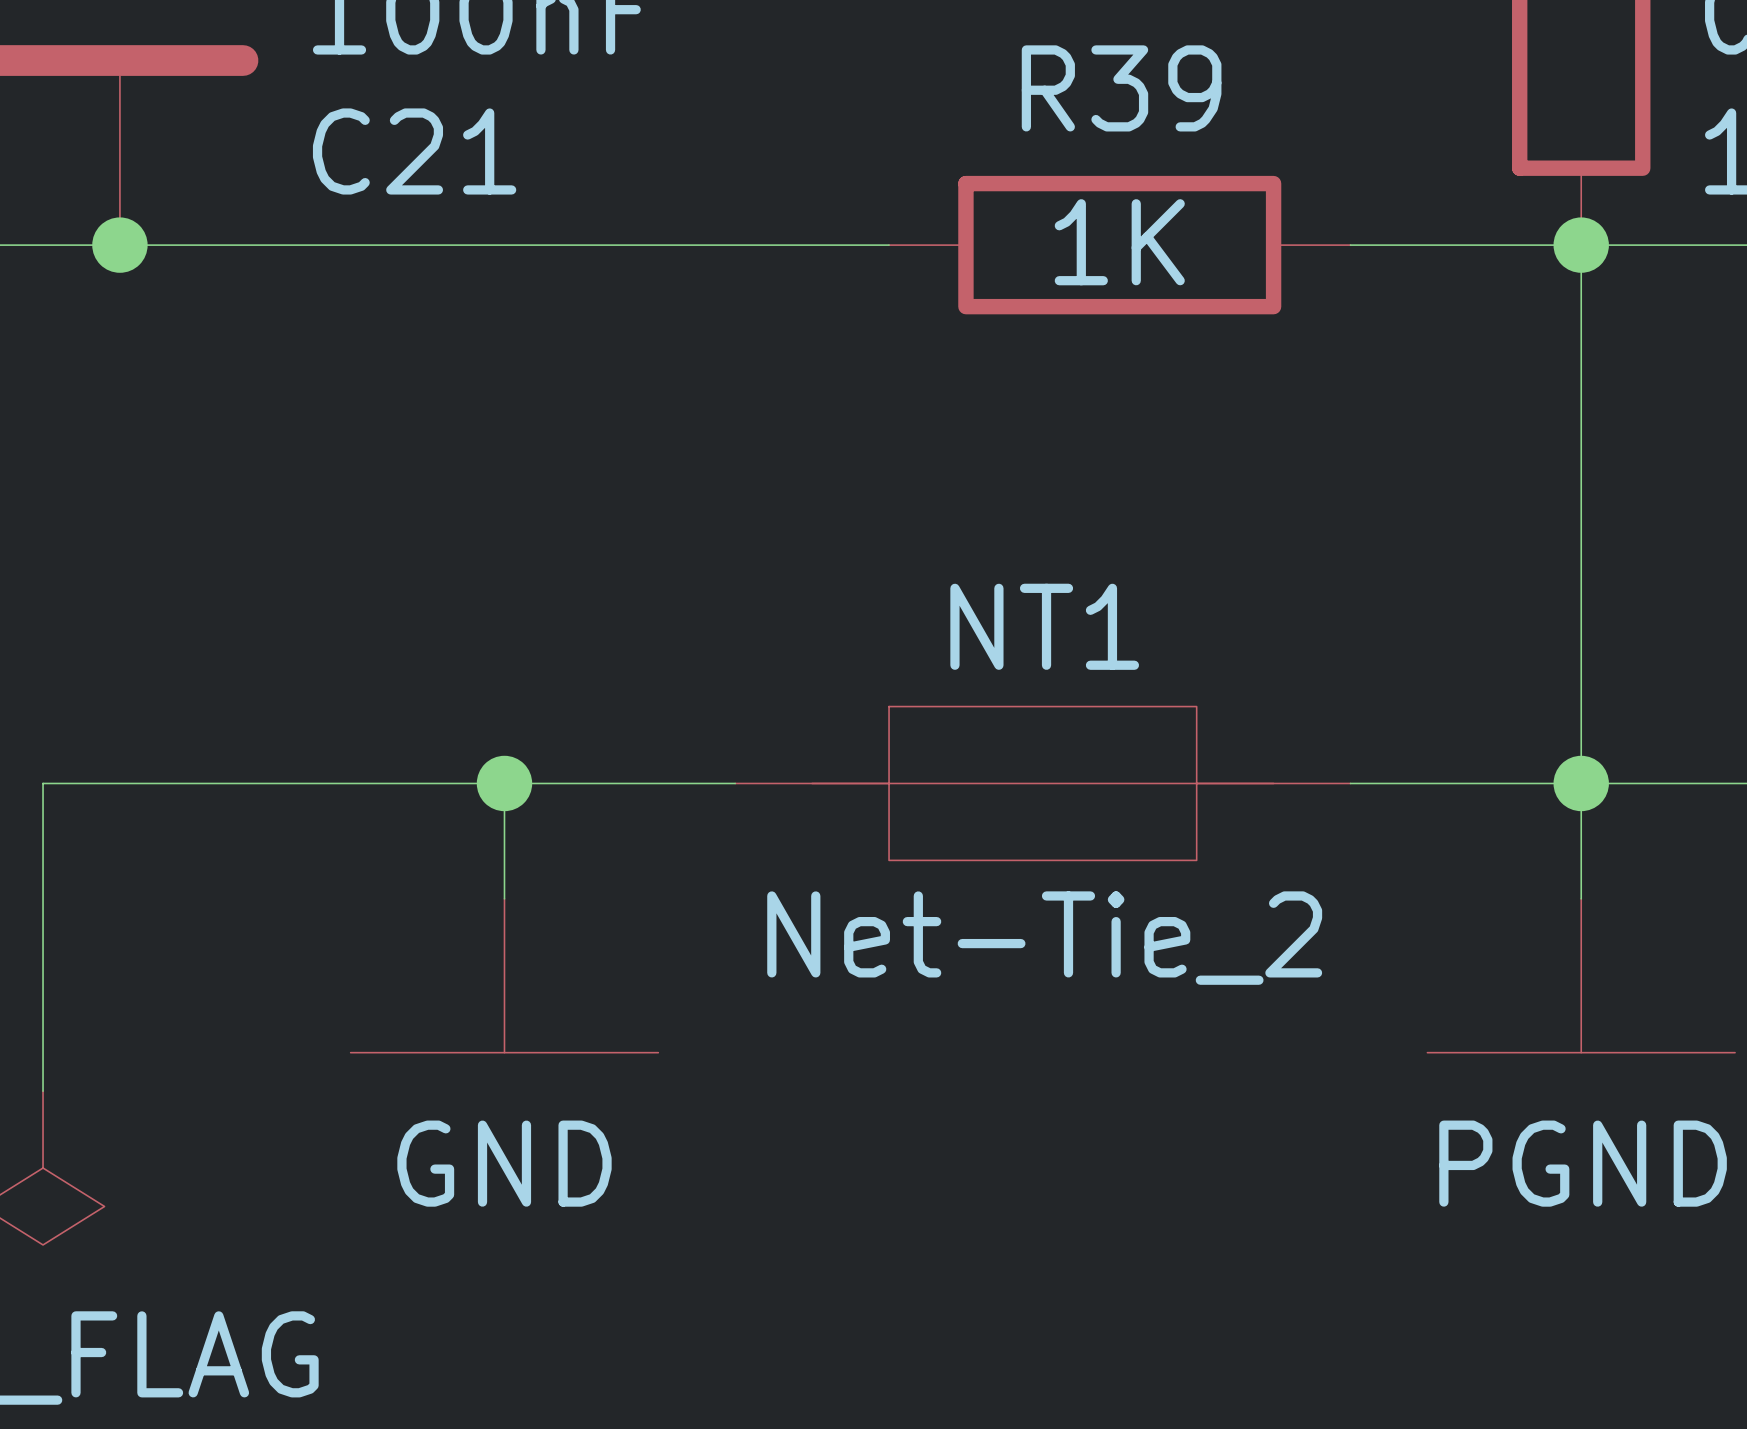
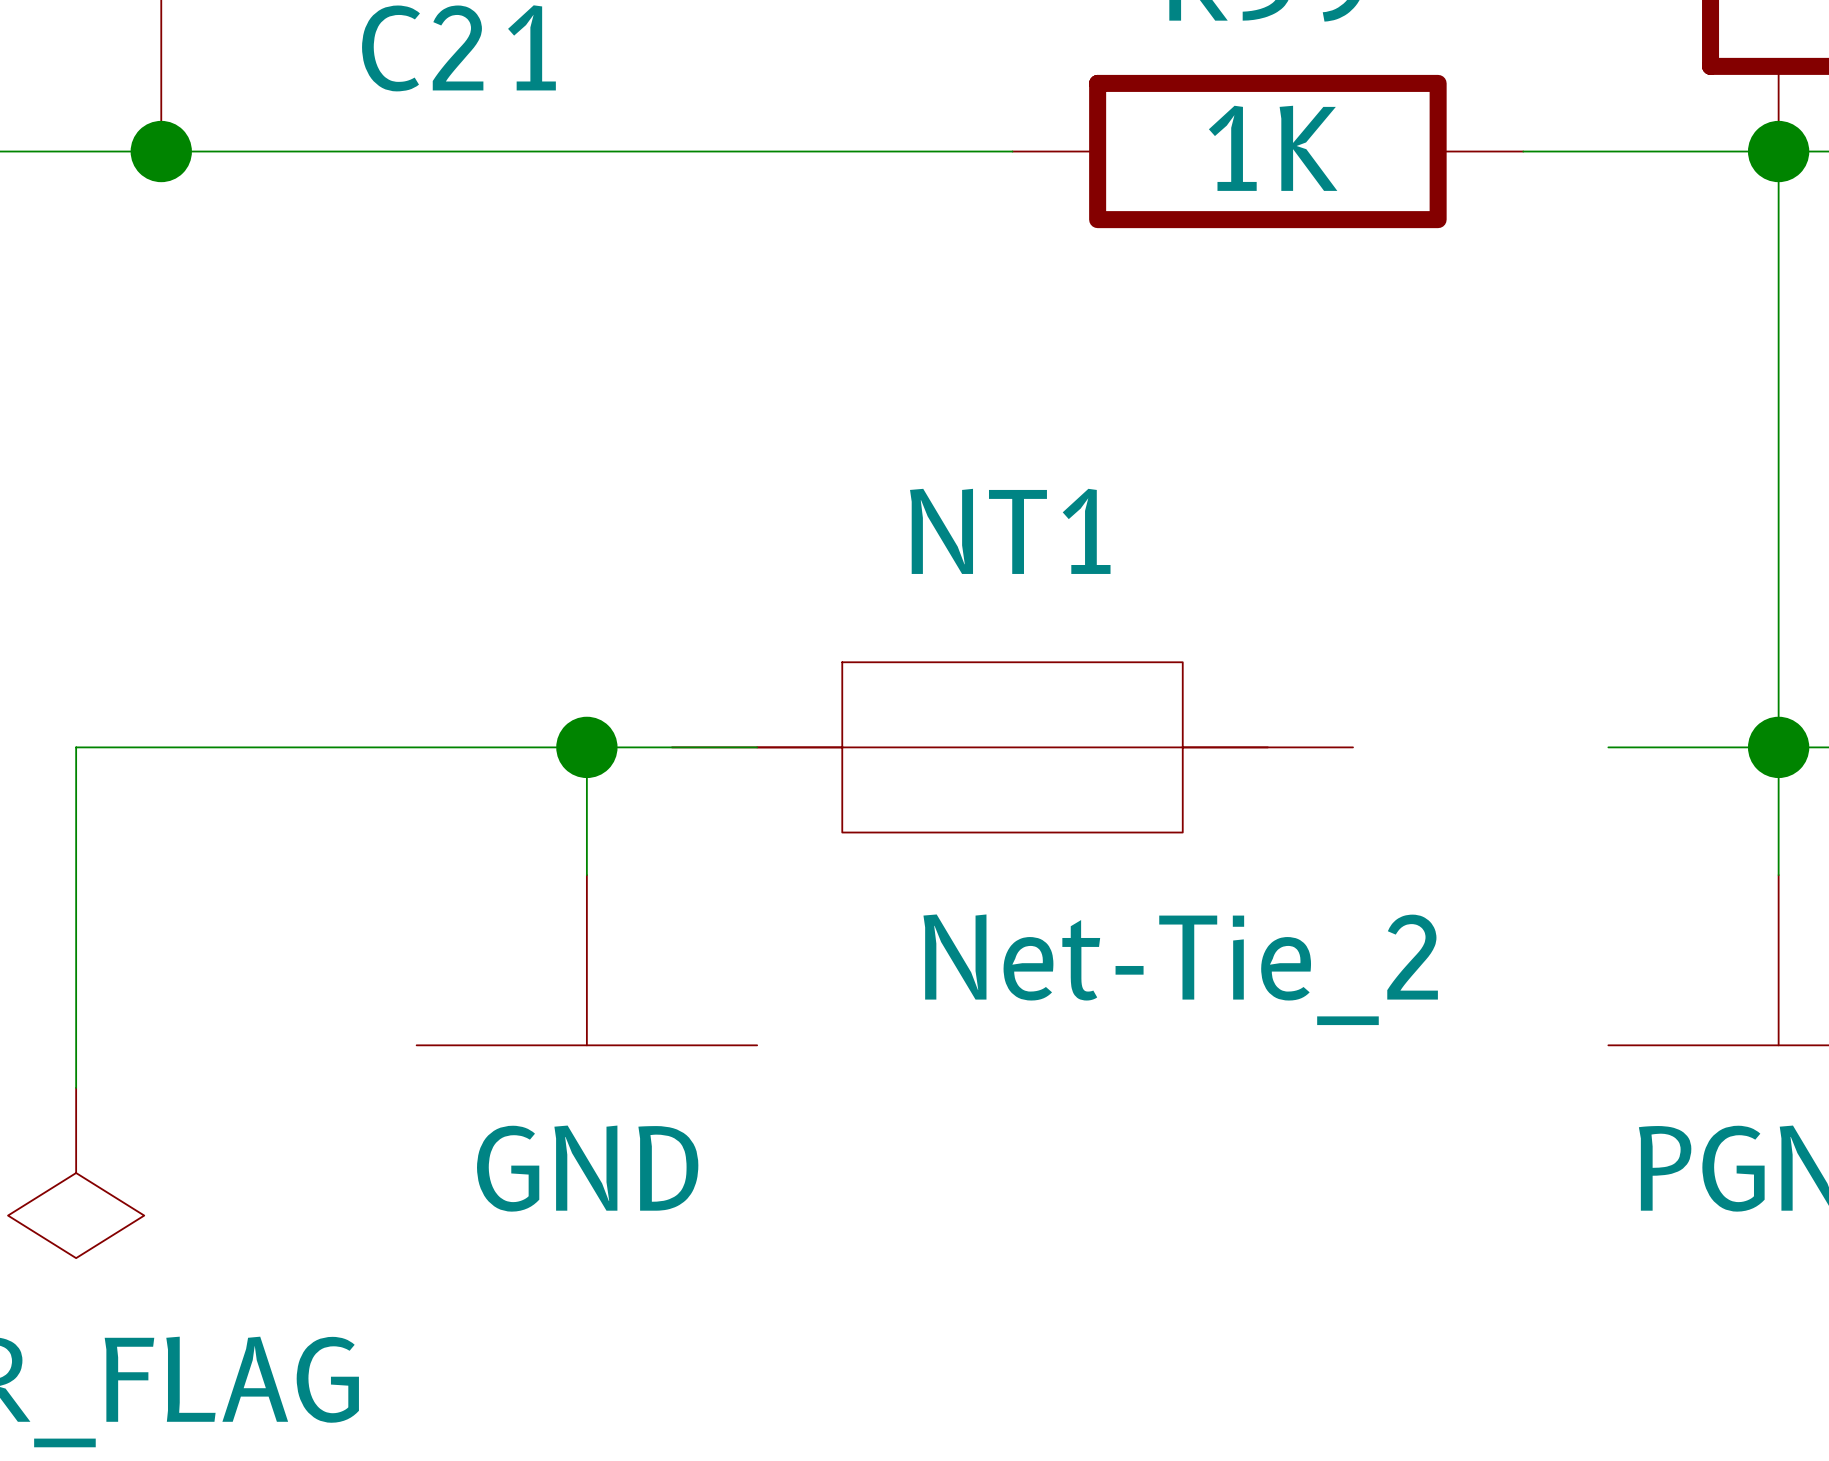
NT1 name position: NT1 (1044, 626) -> NT1 (1010, 531)
NT1 position: (1042, 783) -> (1012, 747)
wire: (1350, 783) (1427, 783) -> none
NT1 value position: Net-Tie_2 (1044, 938) -> Net-Tie_2 (1180, 969)

